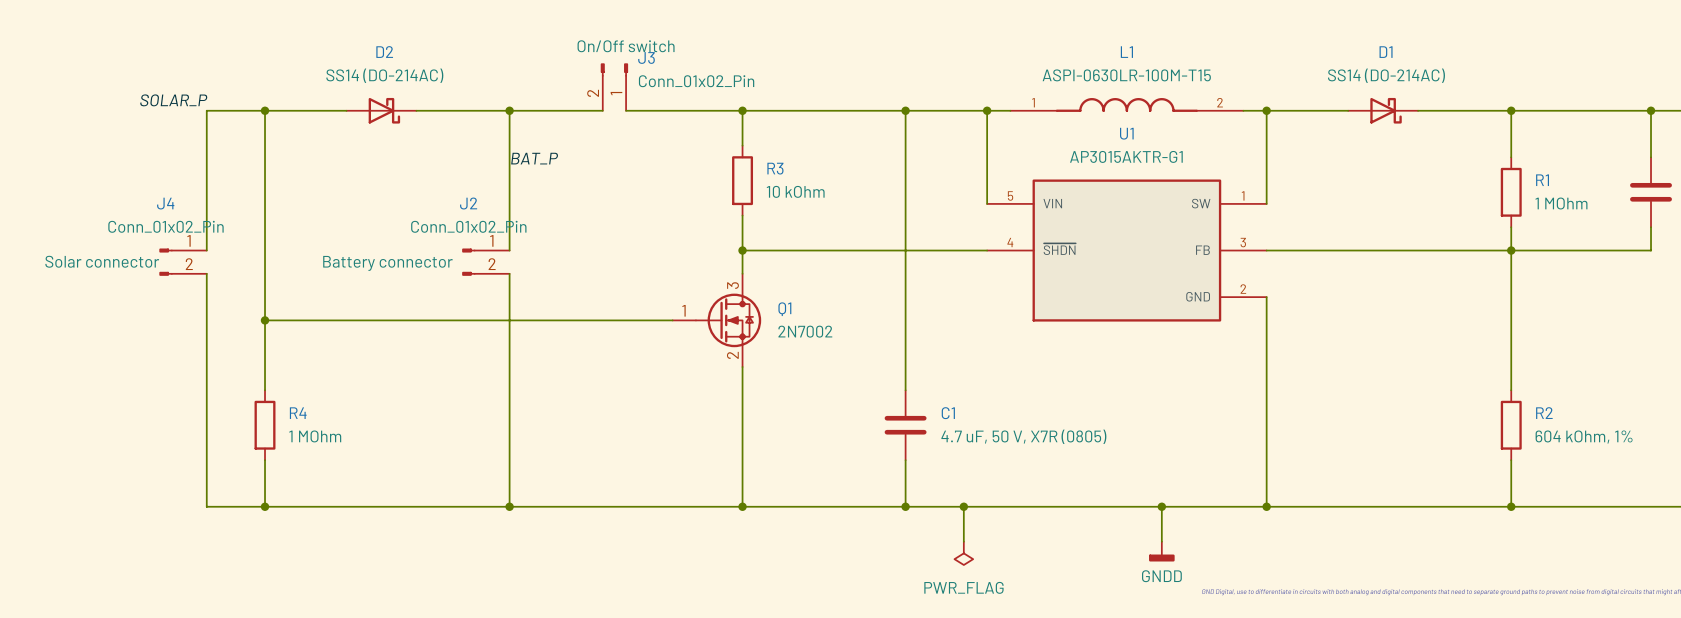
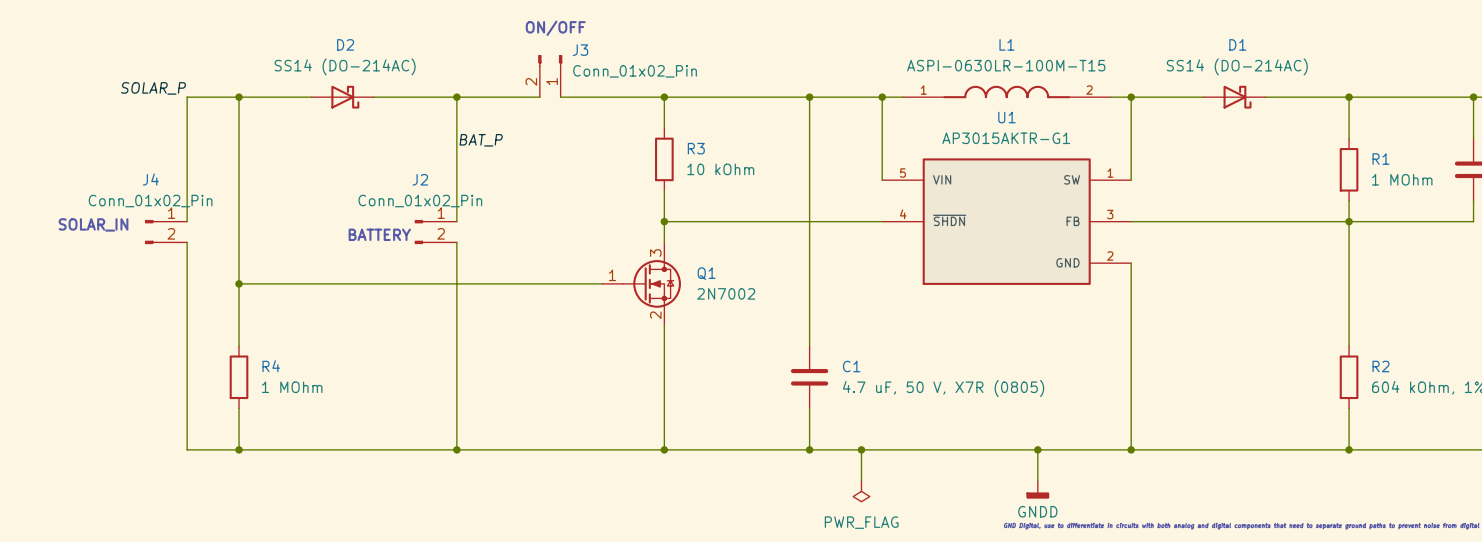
text: none -> ON/OFF (555, 28)
J3 text: On/Off switch (626, 46) -> none
text: none -> SOLAR_IN (93, 224)
J4 text: Solar connector (102, 261) -> none
J2 text: Battery connector (387, 263) -> none
text: none -> BATTERY (379, 234)

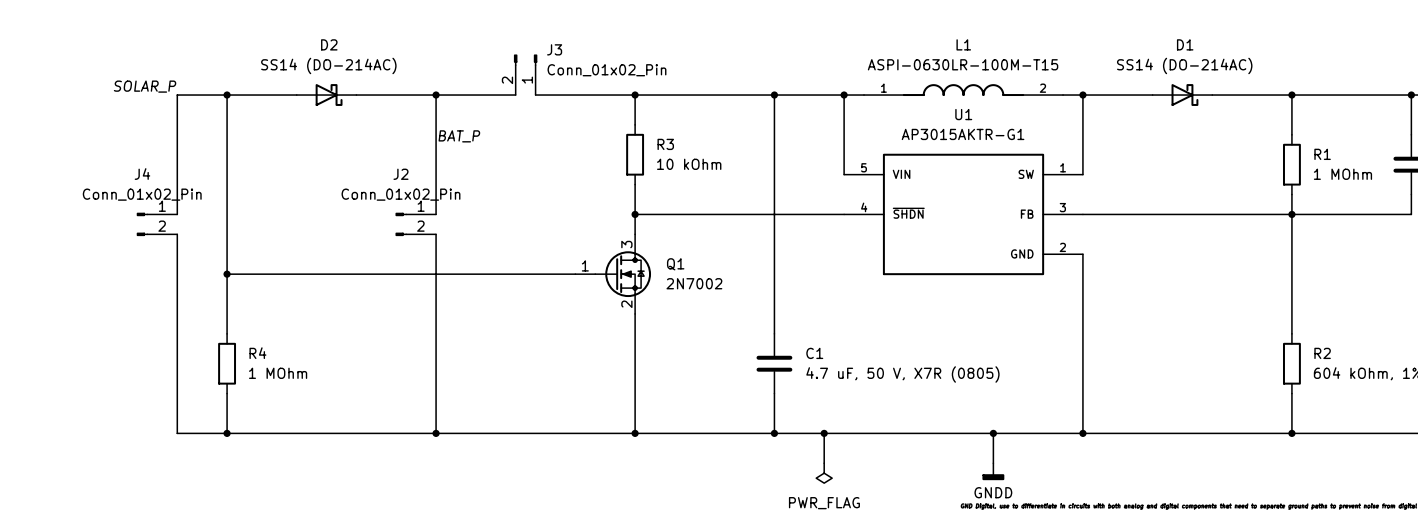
text: ON/OFF (555, 28) -> none
text: SOLAR_IN (93, 224) -> none
text: BATTERY (379, 234) -> none

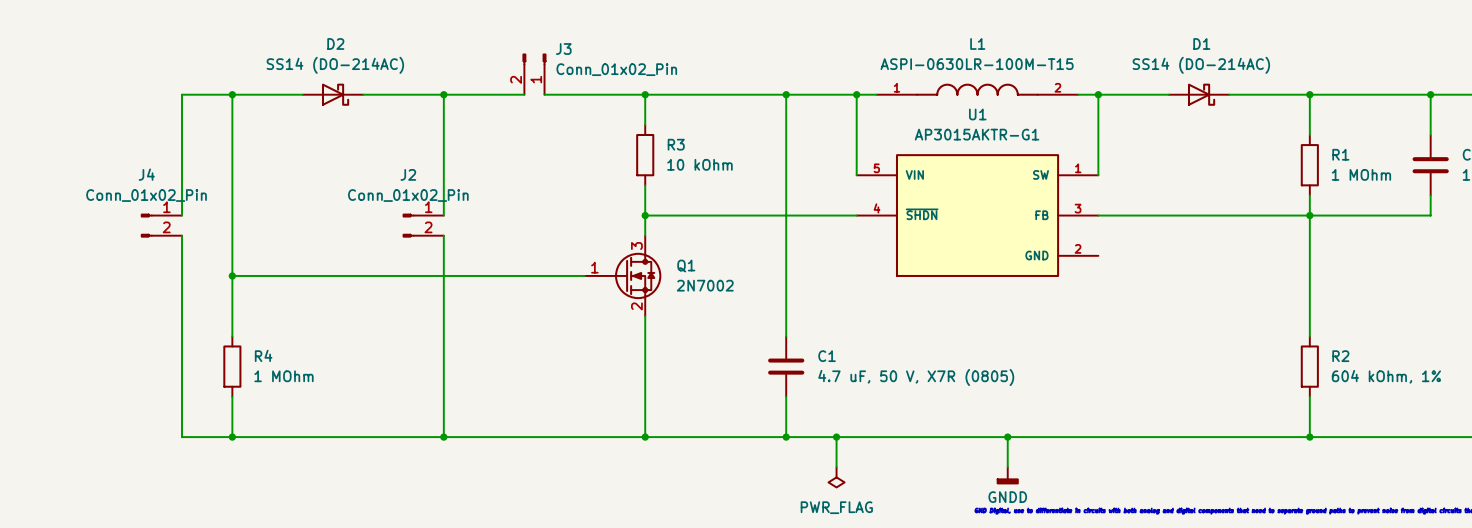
label: SOLAR_P (145, 86) -> none
label: BAT_P (459, 136) -> none
wire: (1082, 254) (1082, 433) -> none
junction: (1082, 433) -> none

